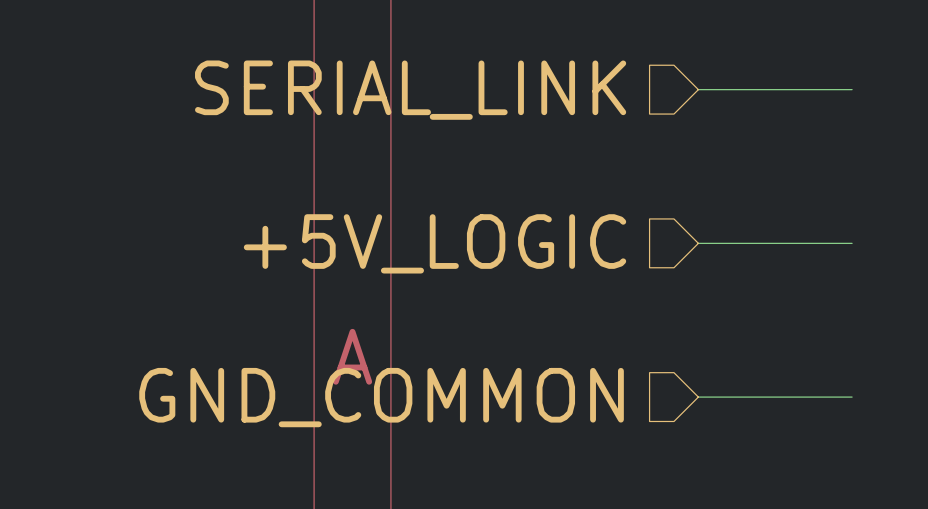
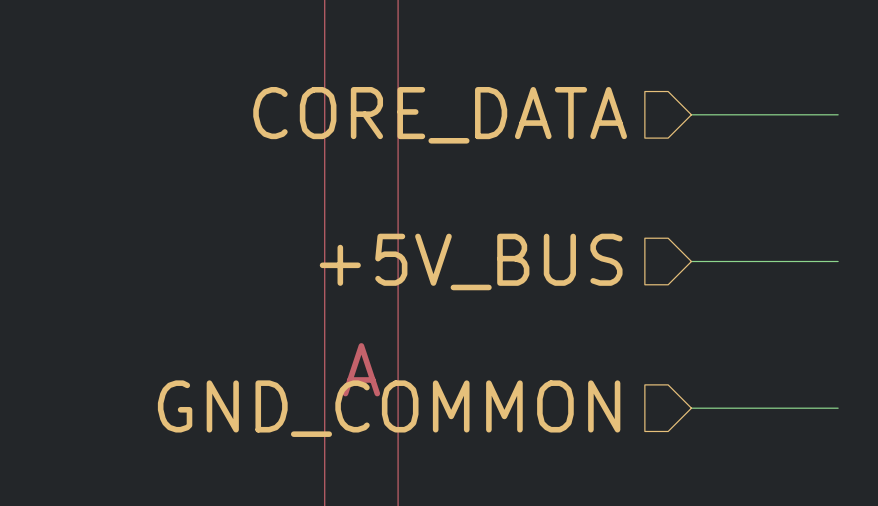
hierarchical label: SERIAL_LINK (410, 90) -> CORE_DATA (440, 115)
hierarchical label: +5V_LOGIC (435, 243) -> +5V_BUS (471, 261)

